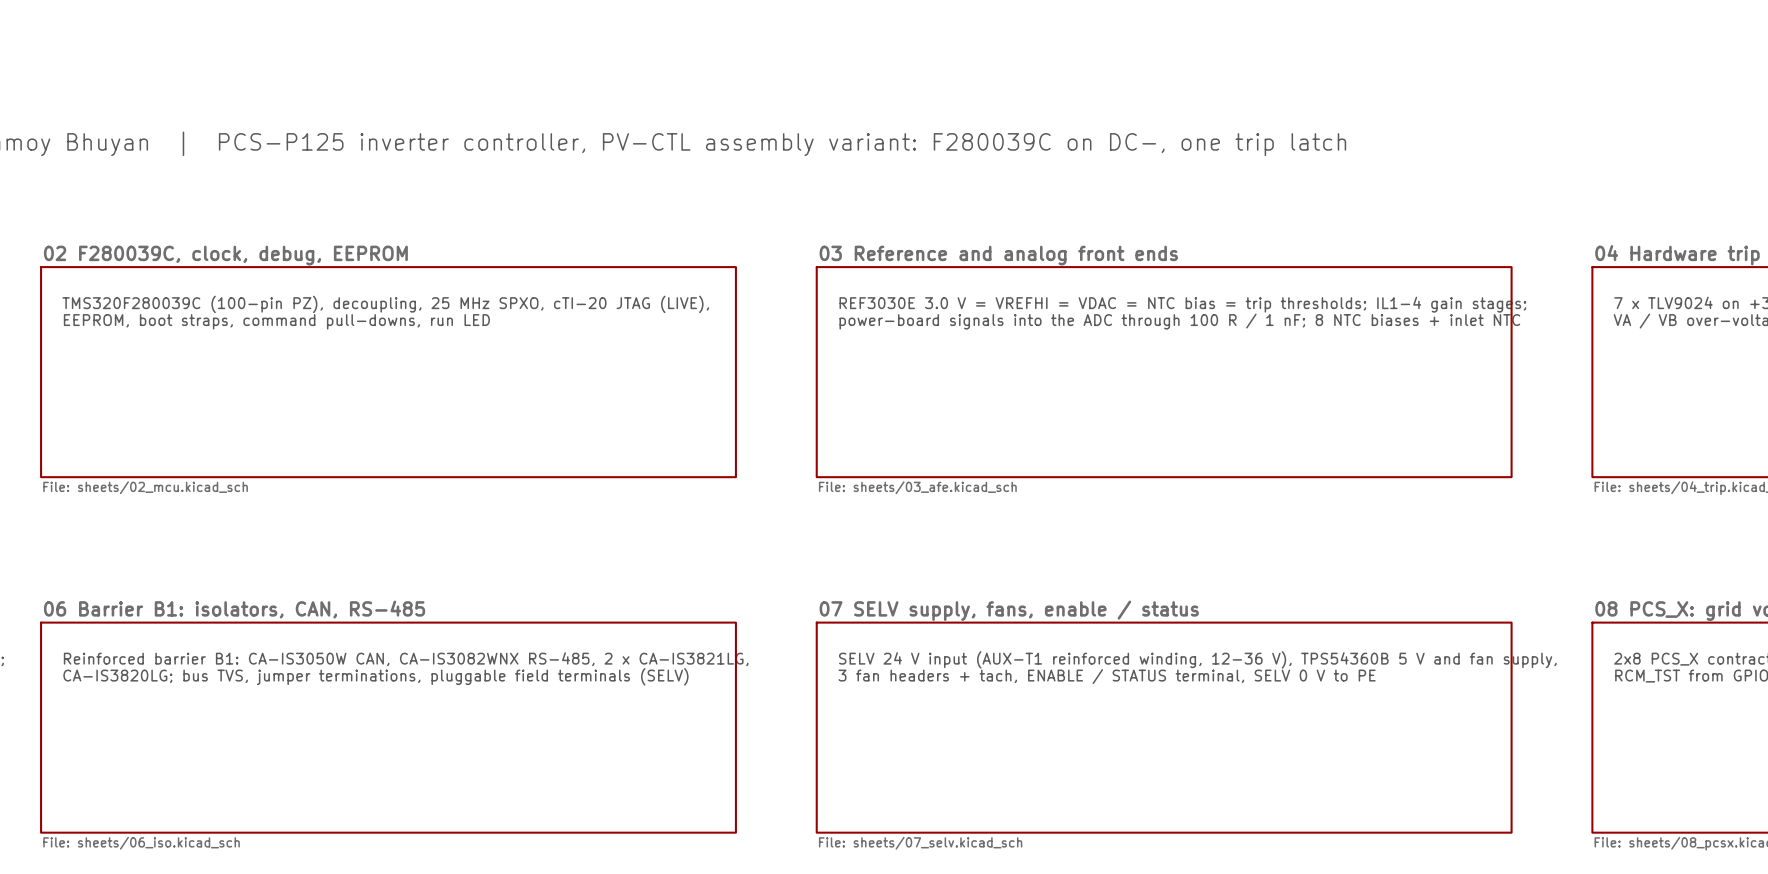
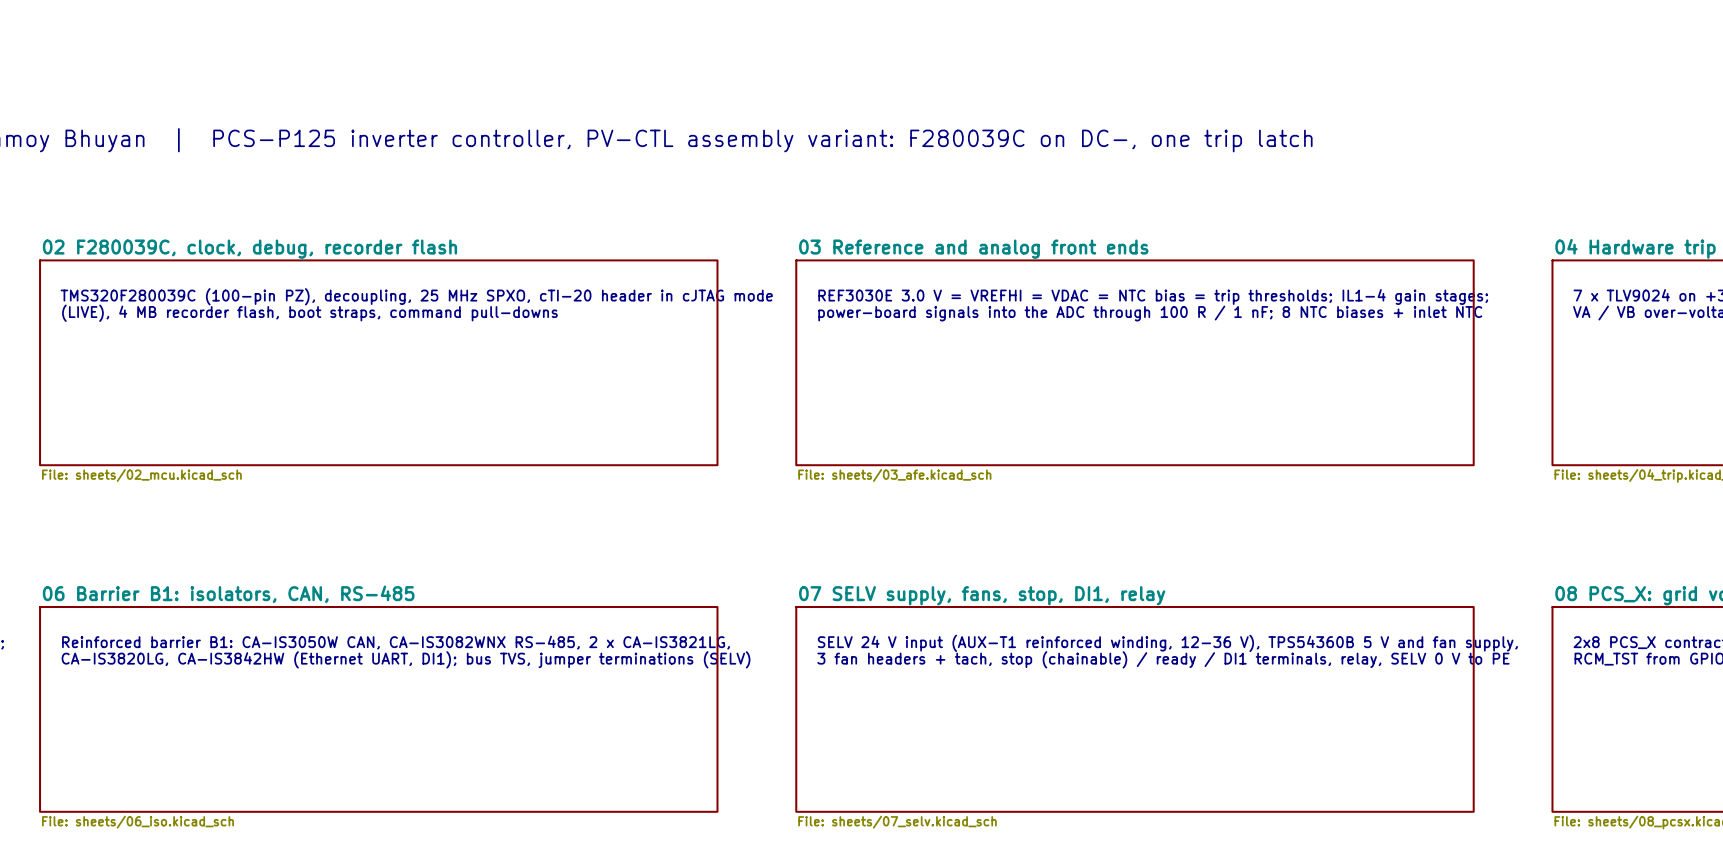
sheet 02 F280039C, clock, debug, EEPROM name: 02 F280039C, clock, debug, EEPROM (225, 255) -> 02 F280039C, clock, debug, recorder flash (249, 249)
text: TMS320F280039C (100-pin PZ), decoupling, 25 MHz SPXO, cTI-20 JTAG (LIVE), (385, 304) -> TMS320F280039C (100-pin PZ), decoupling, 25 MHz SPXO, cTI-20 header in cJTAG mode (416, 296)
text: EEPROM, boot straps, command pull-downs, run LED (276, 321) -> (LIVE), 4 MB recorder flash, boot straps, command pull-downs (309, 313)
sheet 07 SELV supply, fans, enable / status name: 07 SELV supply, fans, enable / status (1009, 610) -> 07 SELV supply, fans, stop, DI1, relay (982, 595)
text: CA-IS3820LG; bus TVS, jumper terminations, pluggable field terminals (SELV) (375, 676) -> CA-IS3820LG, CA-IS3842HW (Ethernet UART, DI1); bus TVS, jumper terminations (SELV) (406, 659)
text: 3 fan headers + tach, ENABLE / STATUS terminal, SELV 0 V to PE (1107, 676) -> 3 fan headers + tach, stop (chainable) / ready / DI1 terminals, relay, SELV 0 V to PE (1163, 659)

